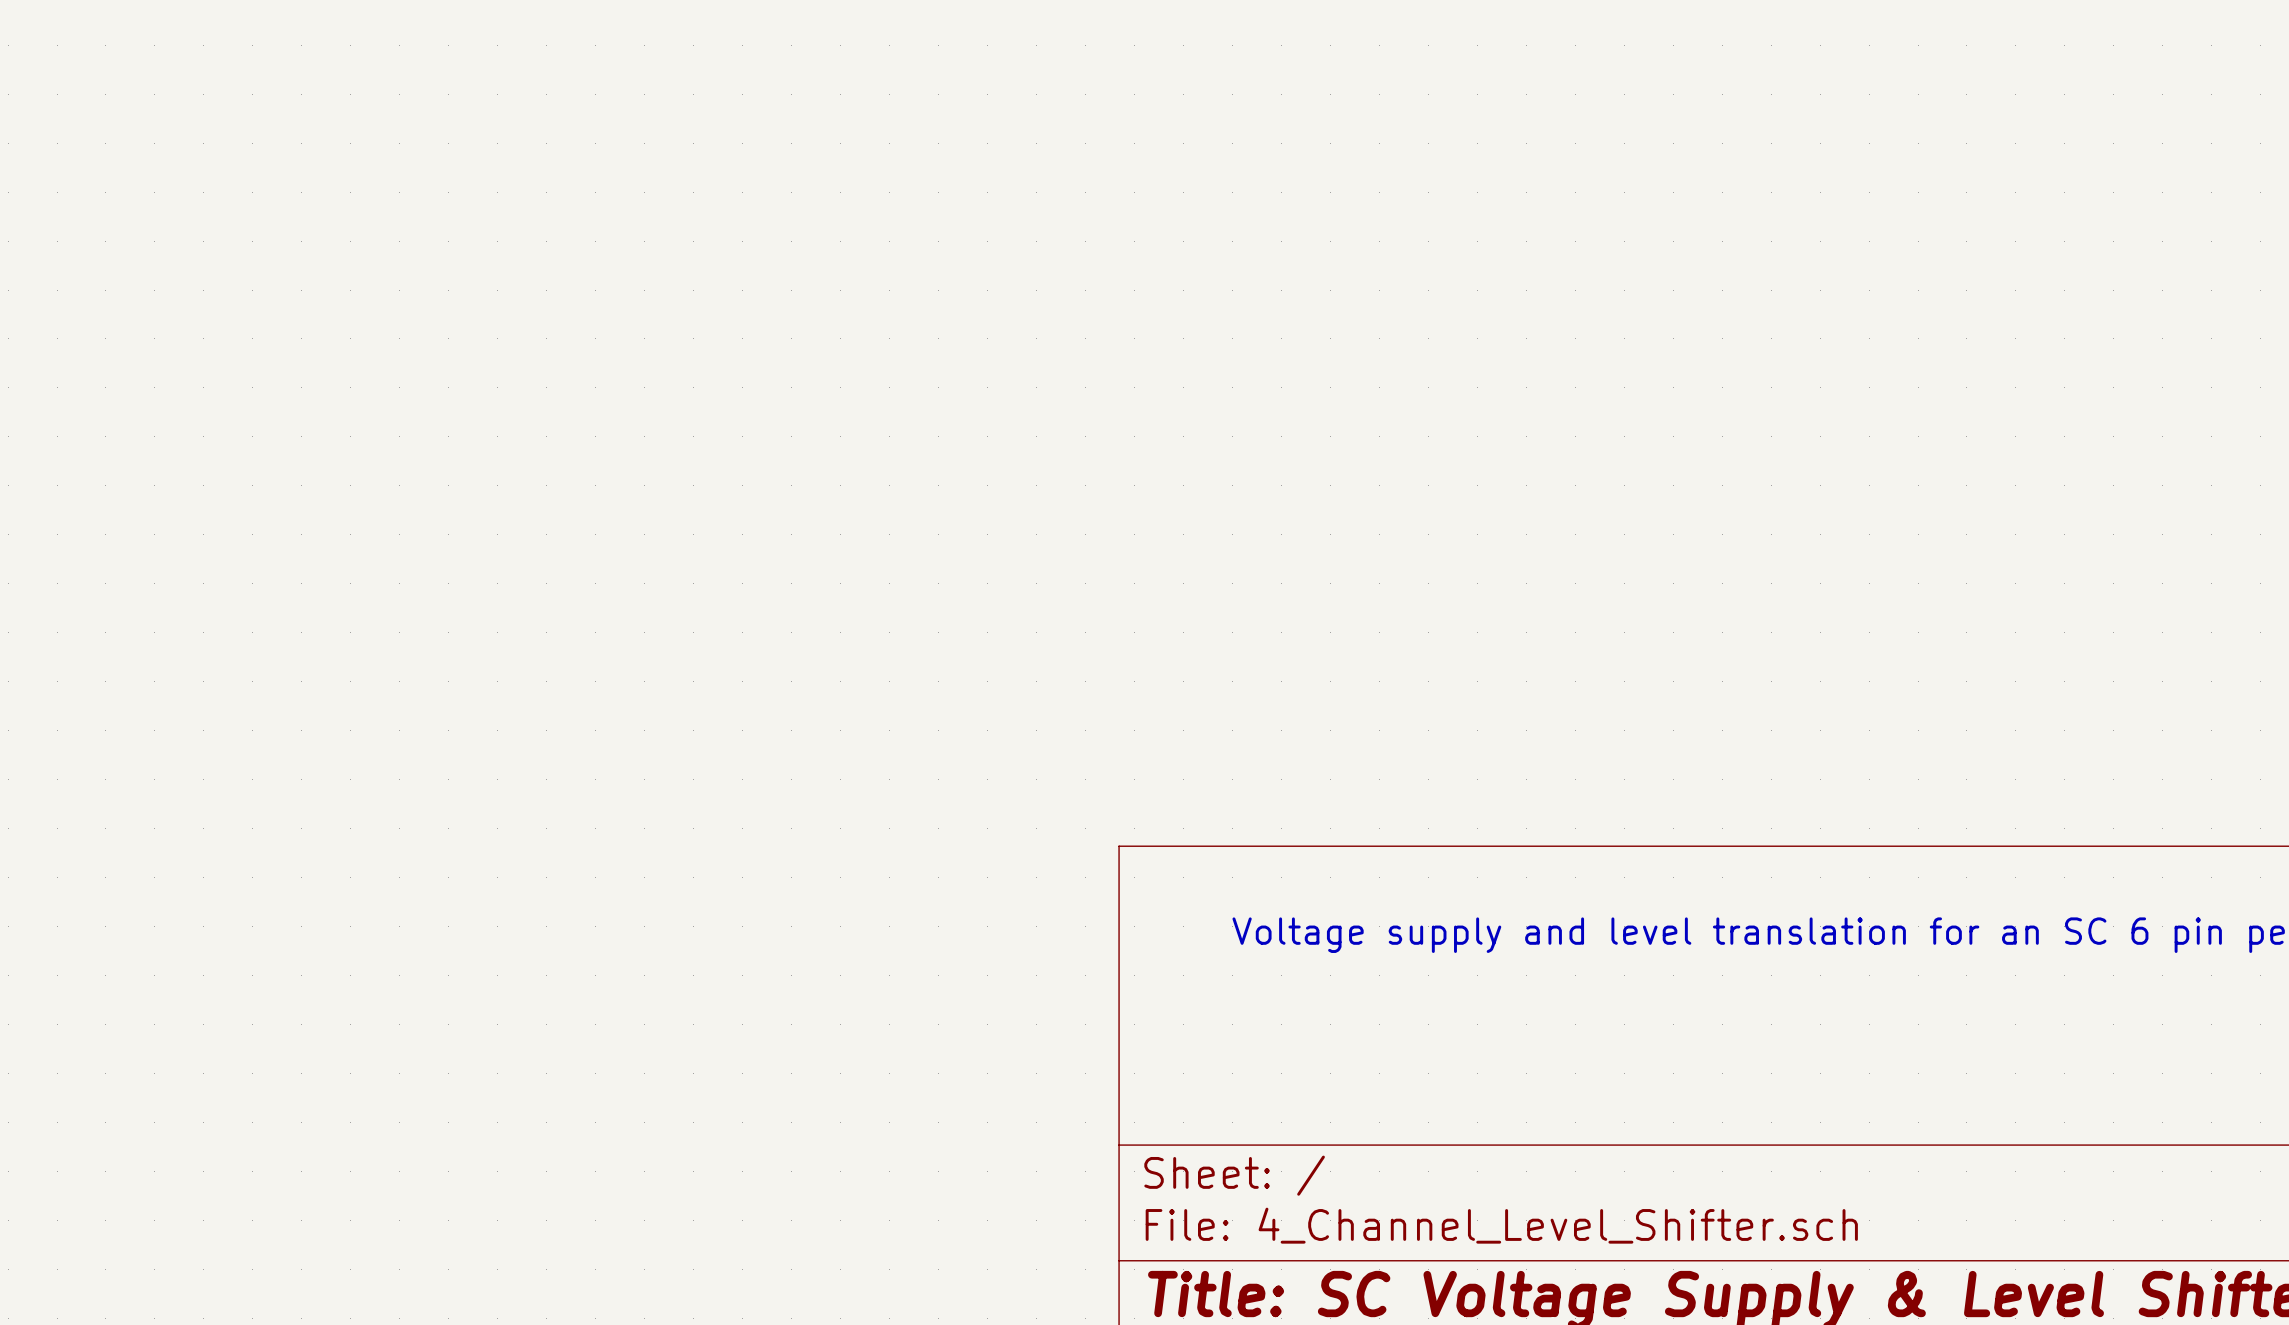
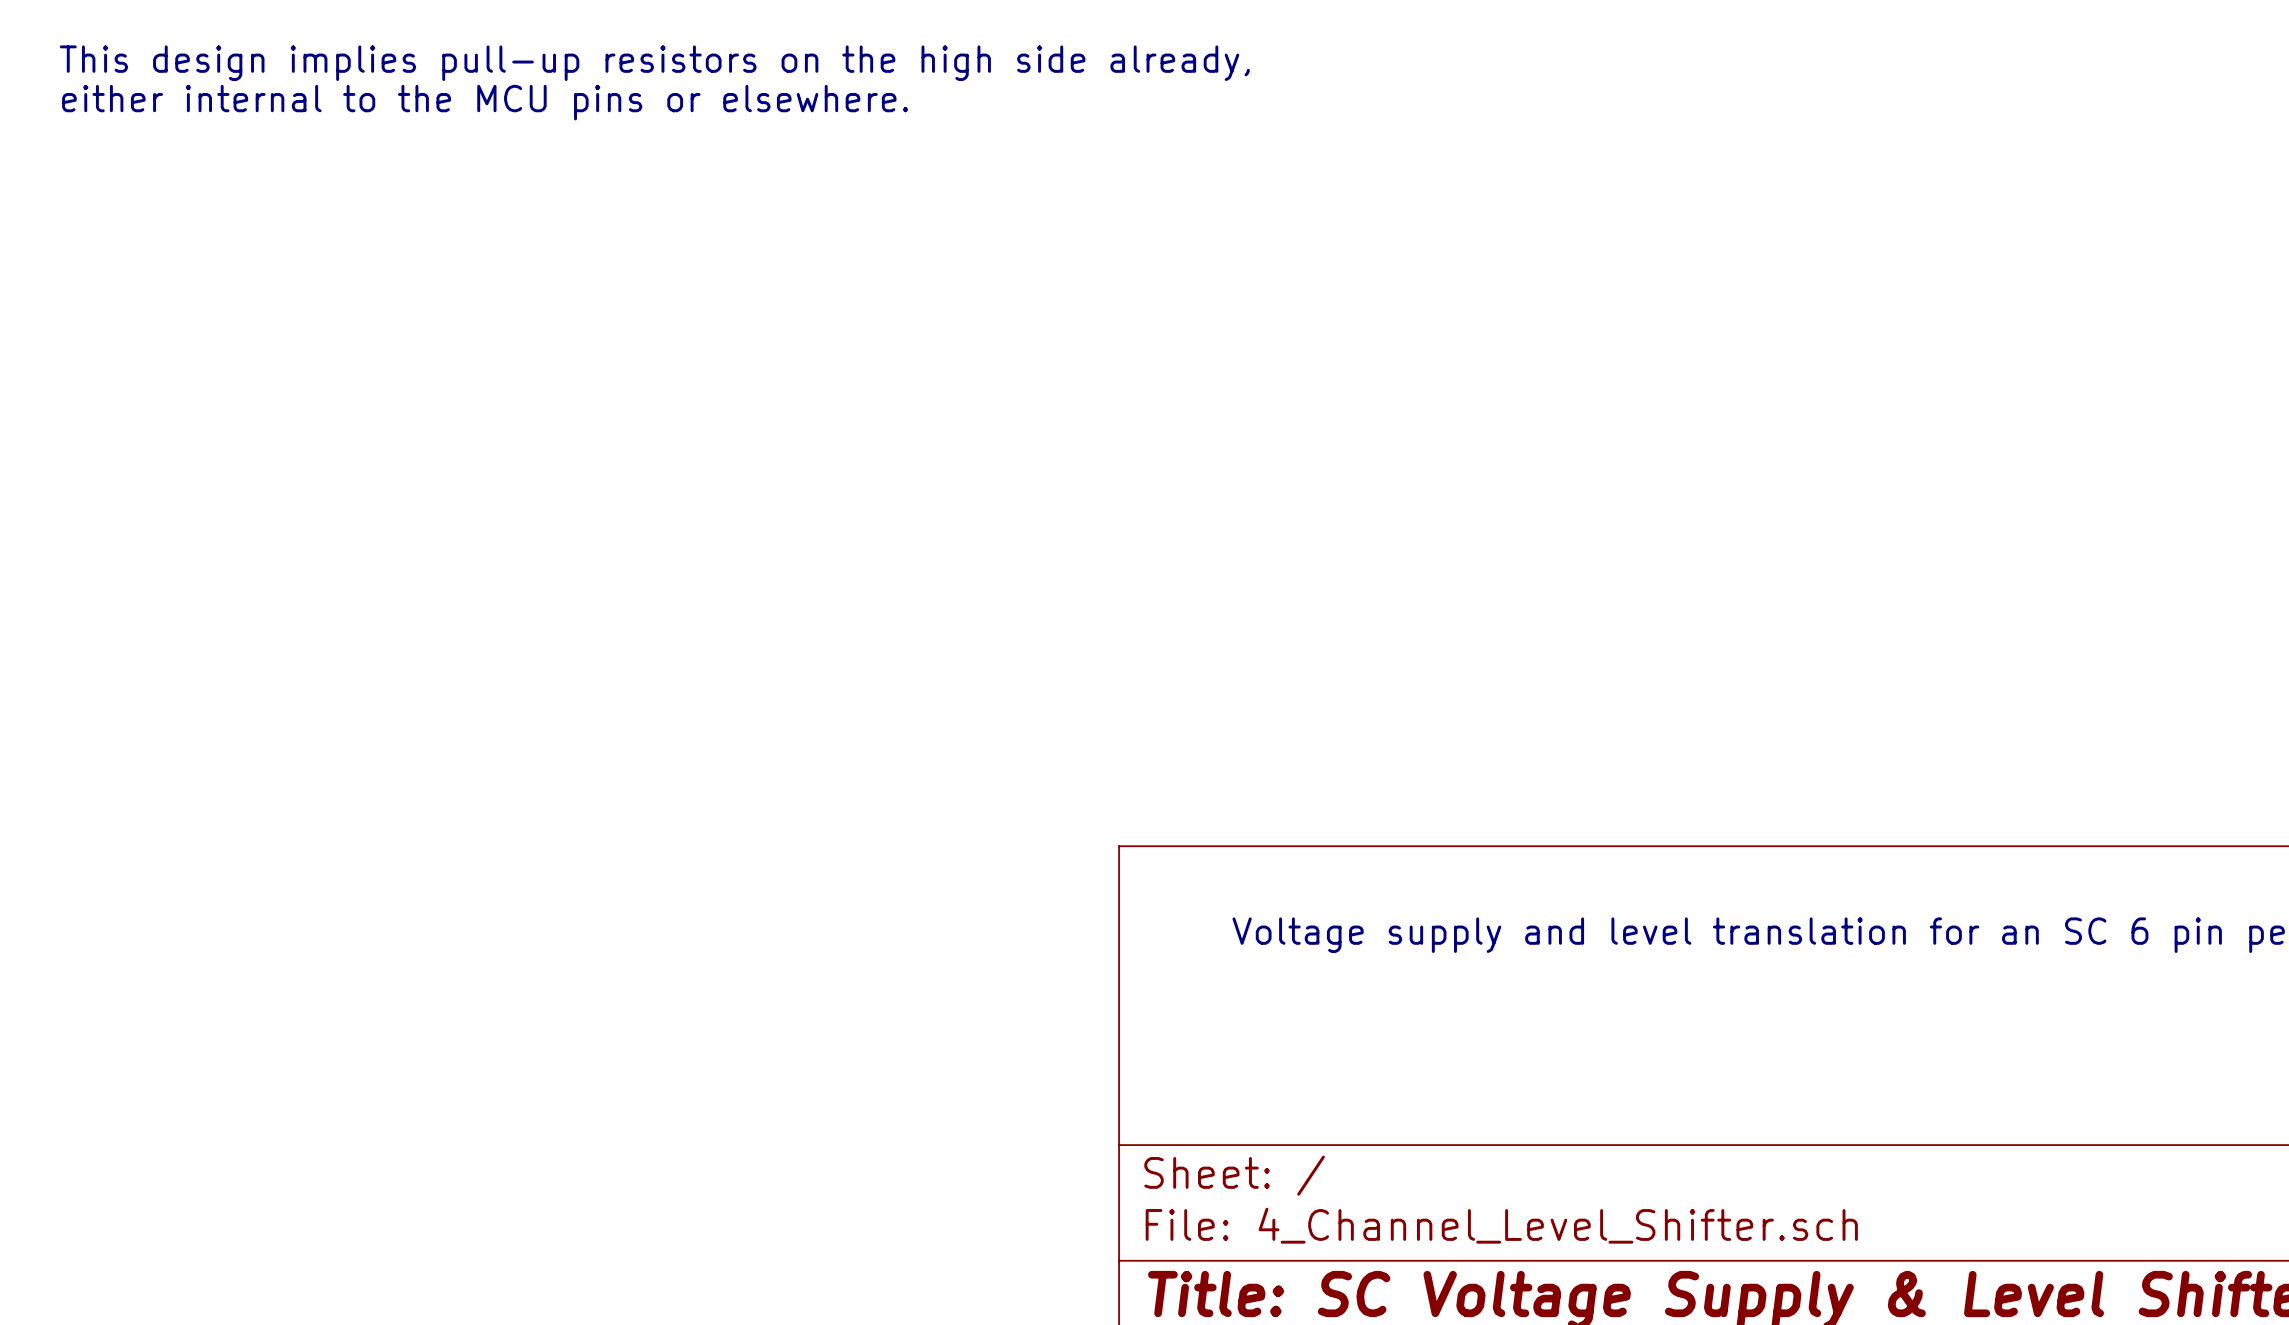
text: none -> This design implies pull-up resistors on the high side already, (654, 63)
text: none -> either internal to the MCU pins or elsewhere. (485, 102)

